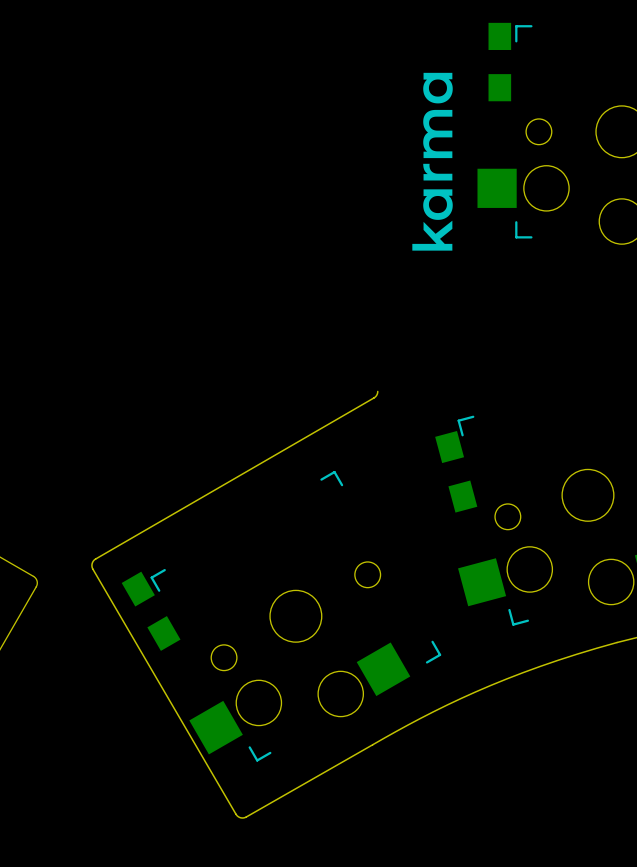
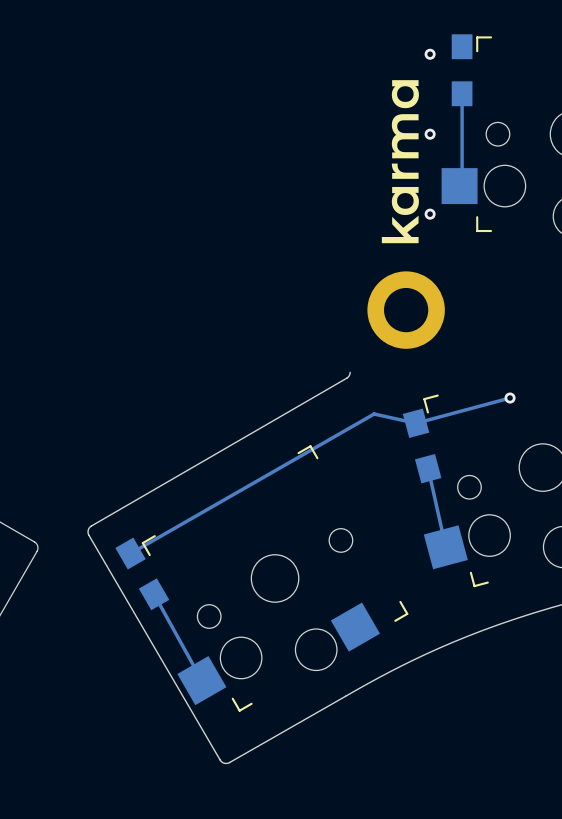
via: none -> (430, 54)
bottom track: none -> (462, 93) (462, 183)
via: none -> (430, 134)
via: none -> (430, 214)
part: none -> (406, 310)
bottom track: none -> (510, 398) (416, 423) (374, 414) (130, 553)
via: none -> (510, 398)
bottom track: none -> (428, 468) (445, 547)
bottom track: none -> (154, 594) (201, 680)

